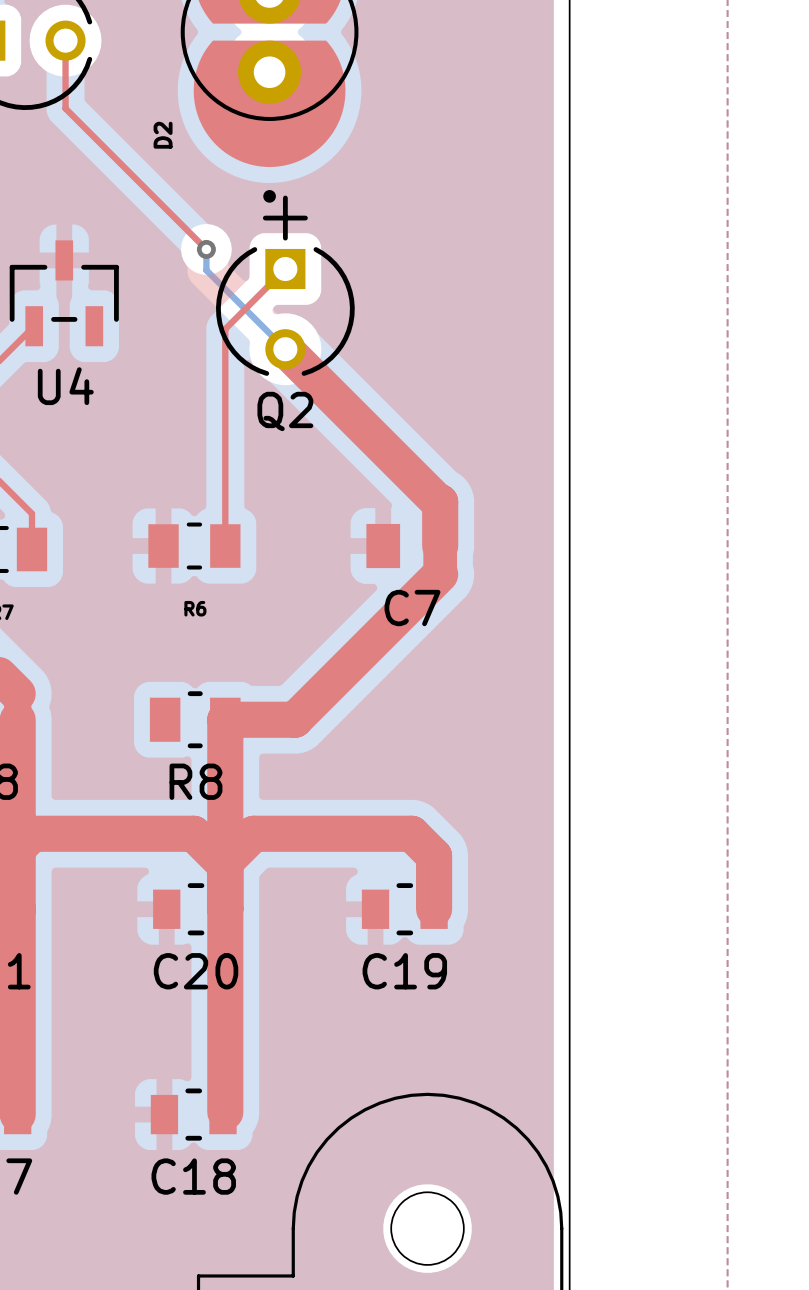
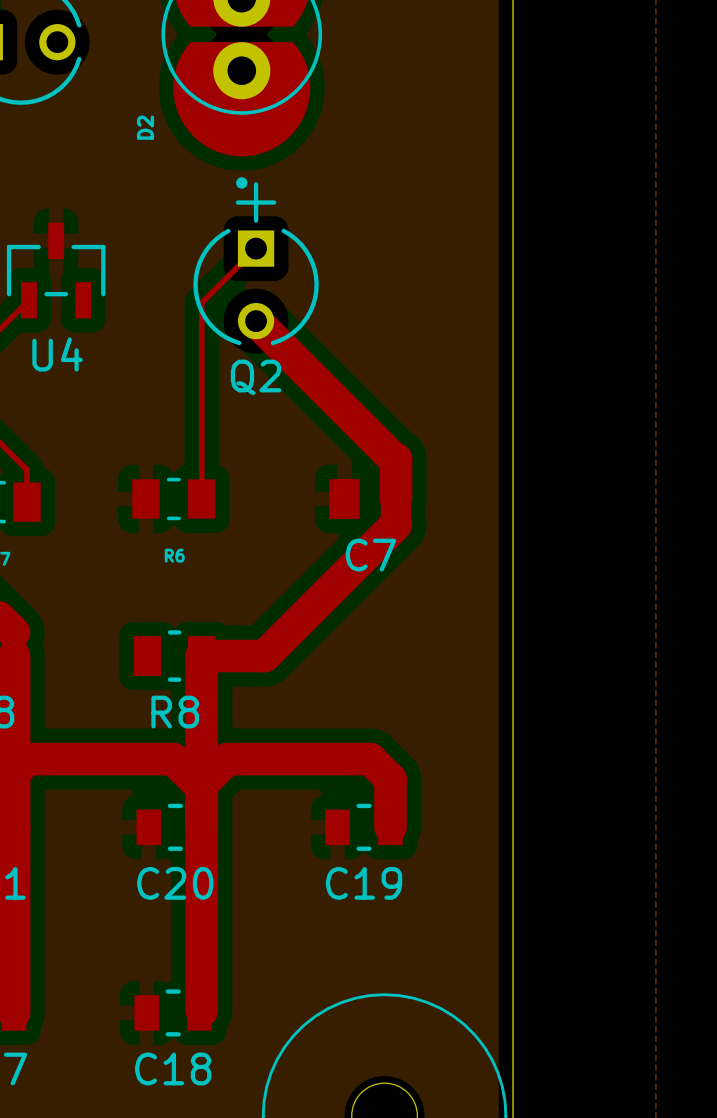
top track: (65, 40) (65, 108) (206, 249) -> none
bottom track: (206, 249) (206, 270) (285, 349) -> none
via: (206, 249) -> none

